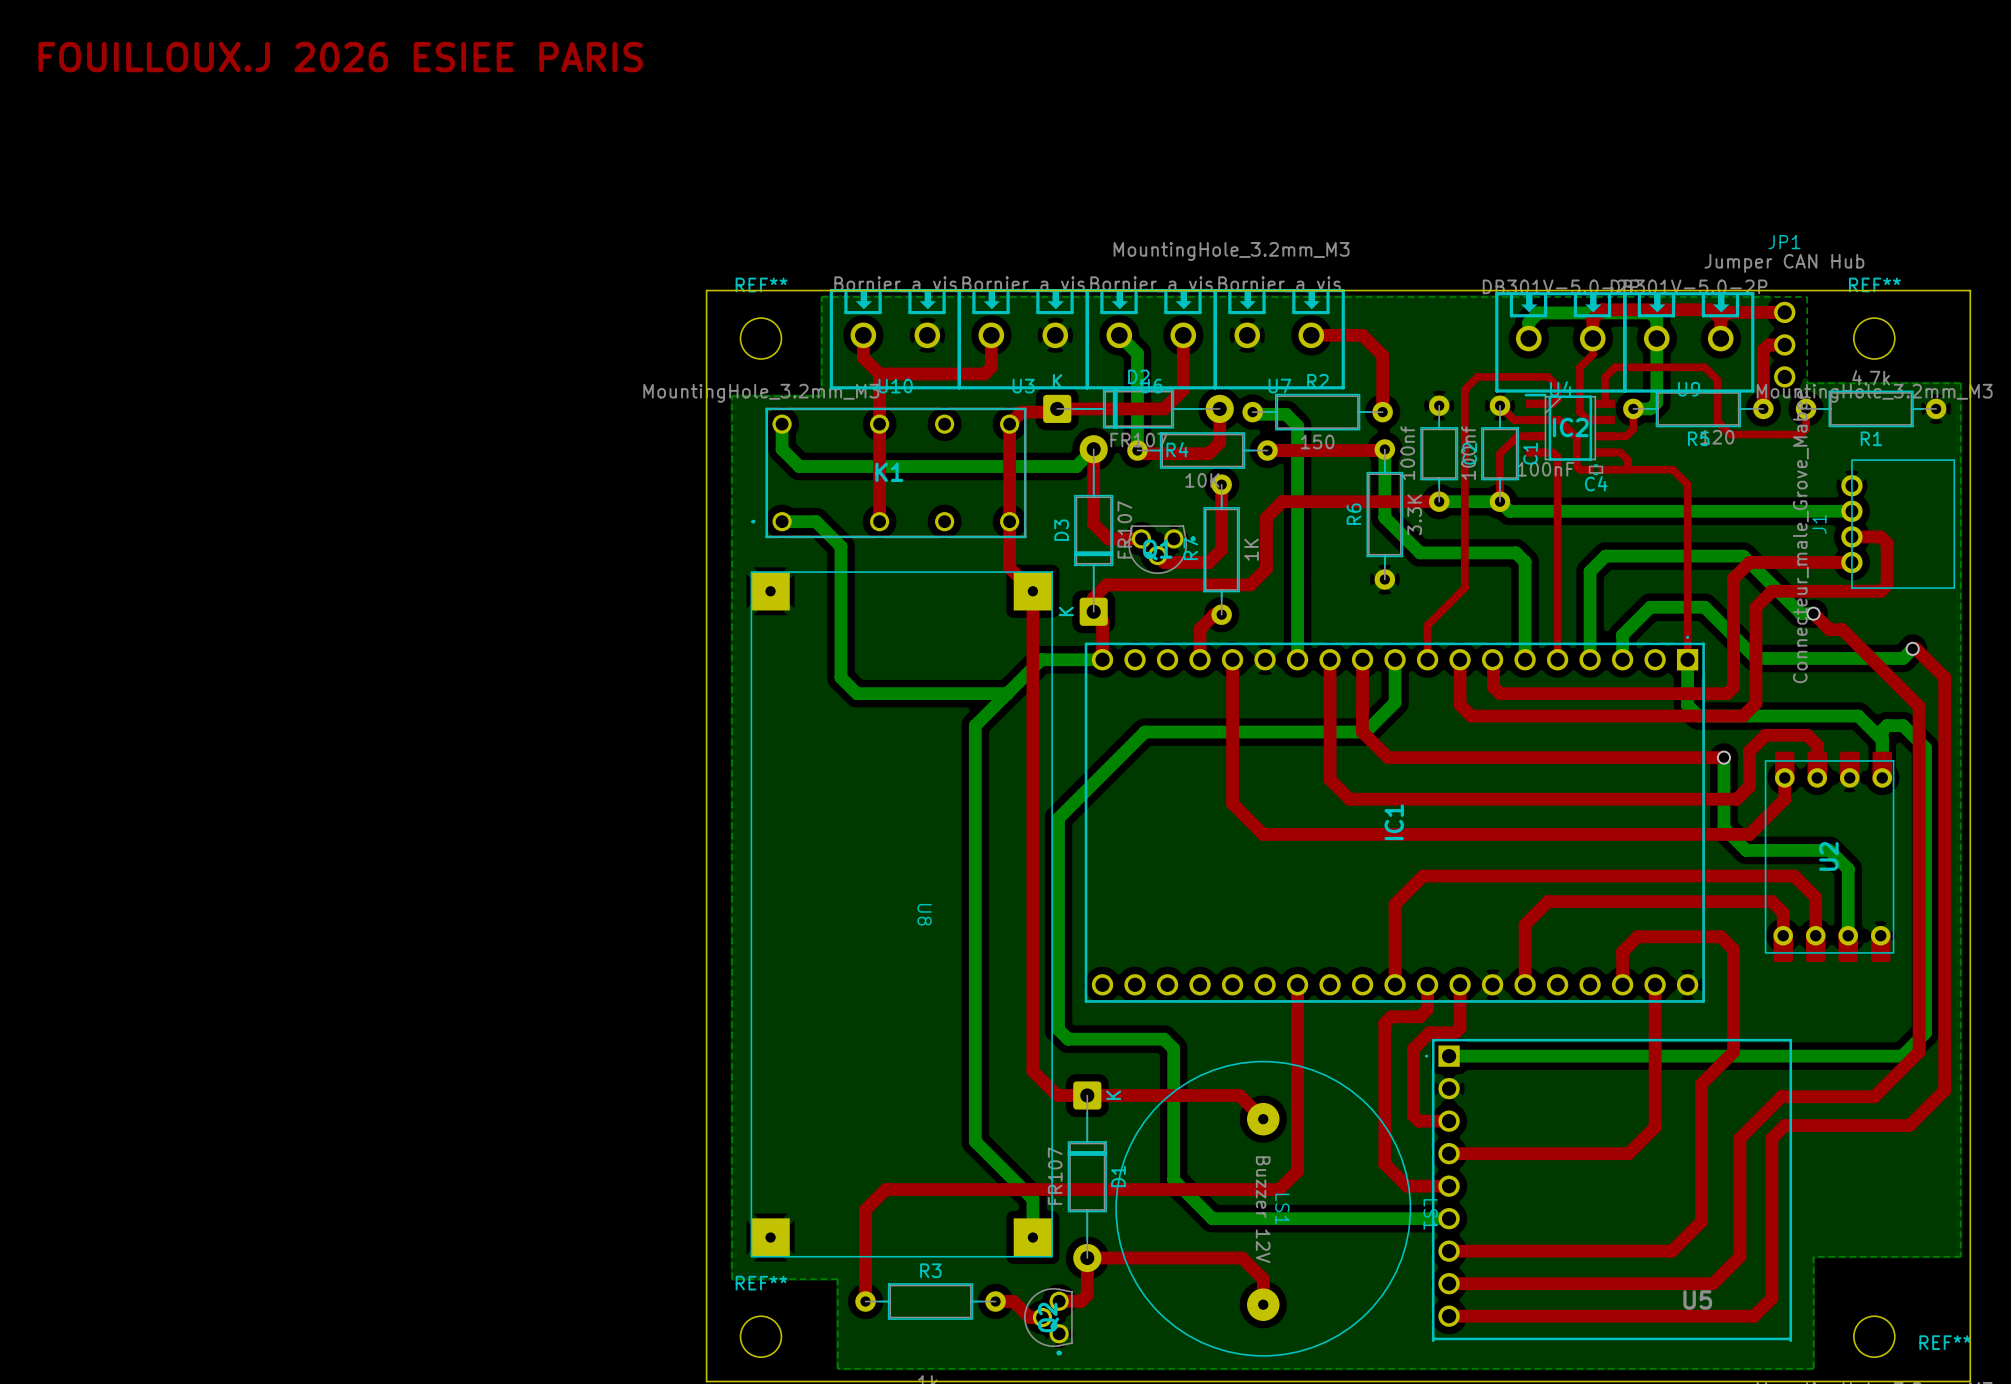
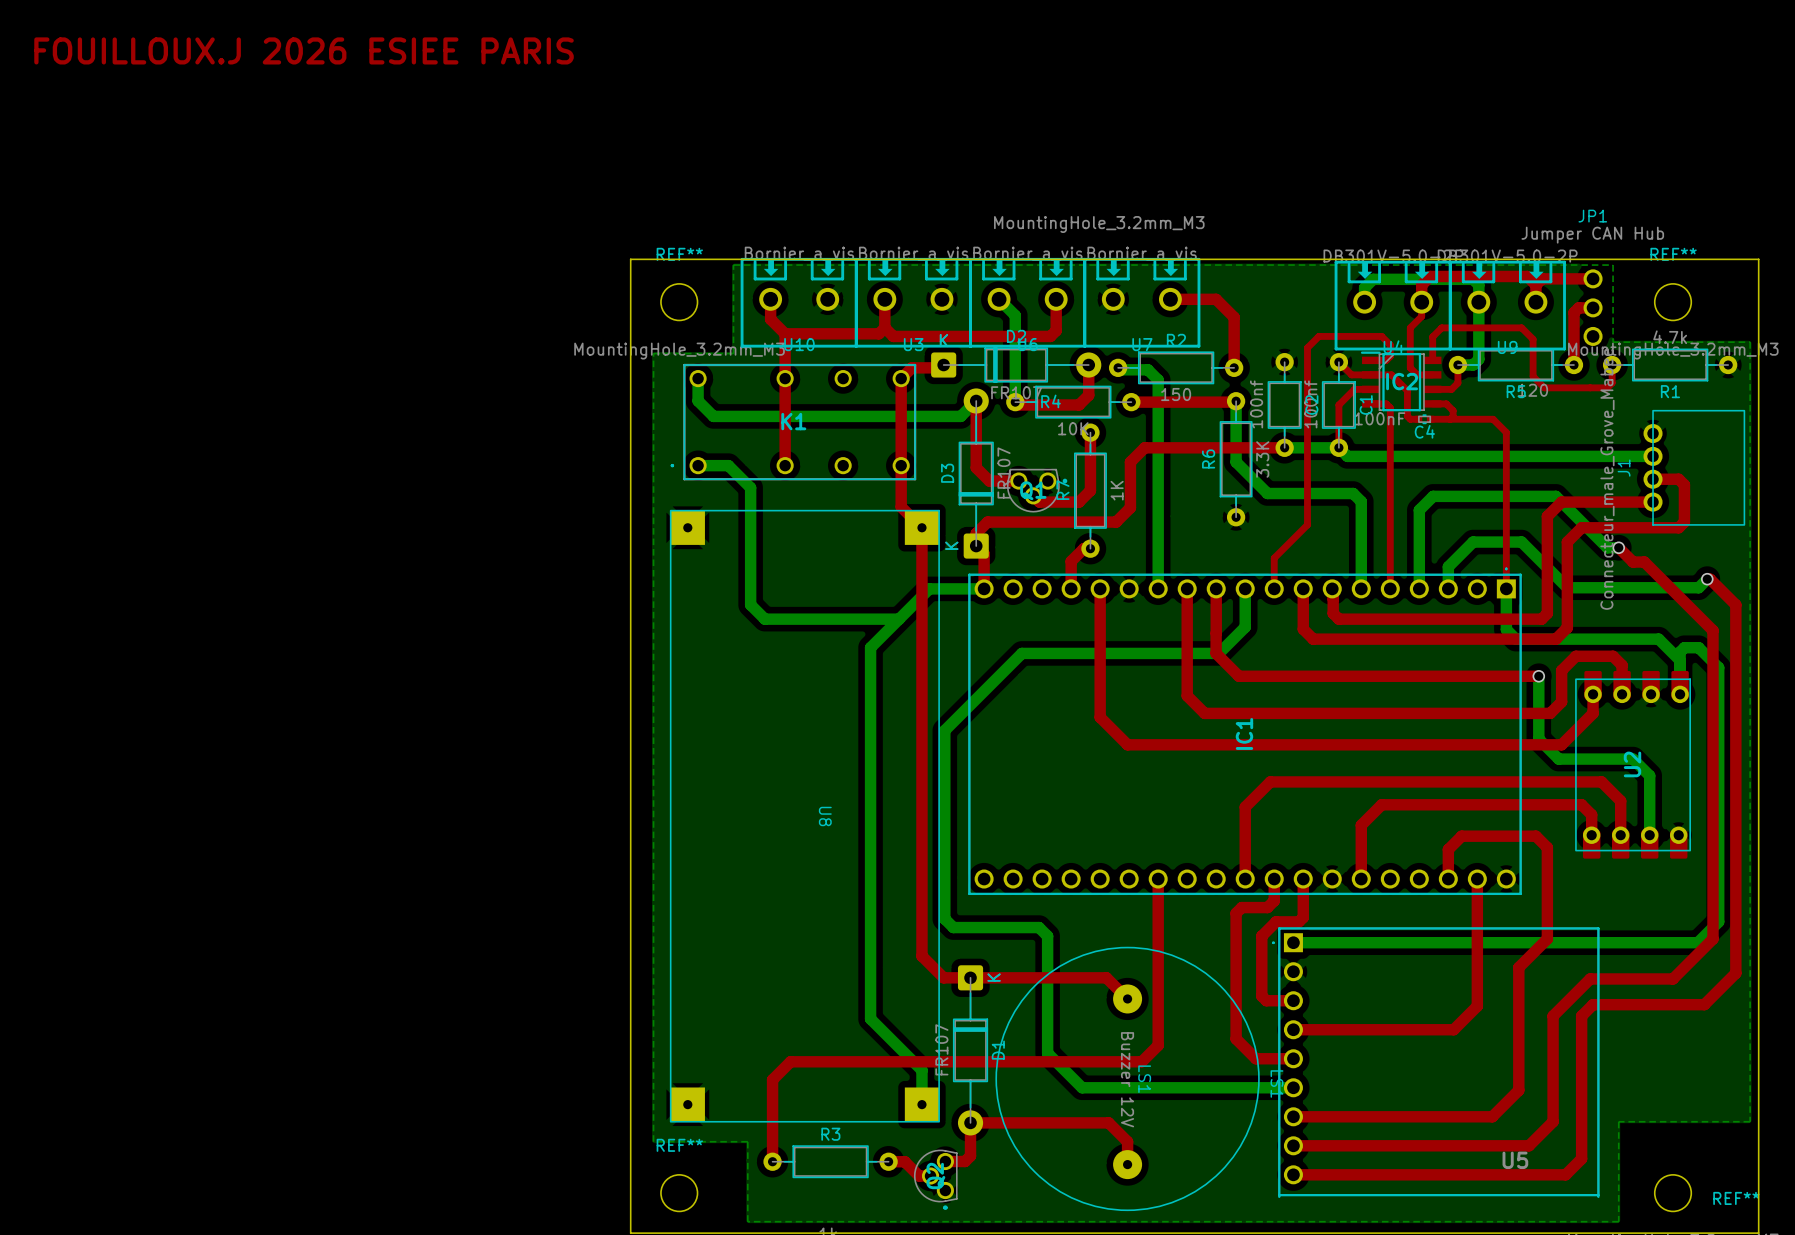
top track: (1183, 370) (1183, 389) (1164, 408) (1057, 408) -> (1056, 330) (1050, 336) (893, 336) (884, 327)

